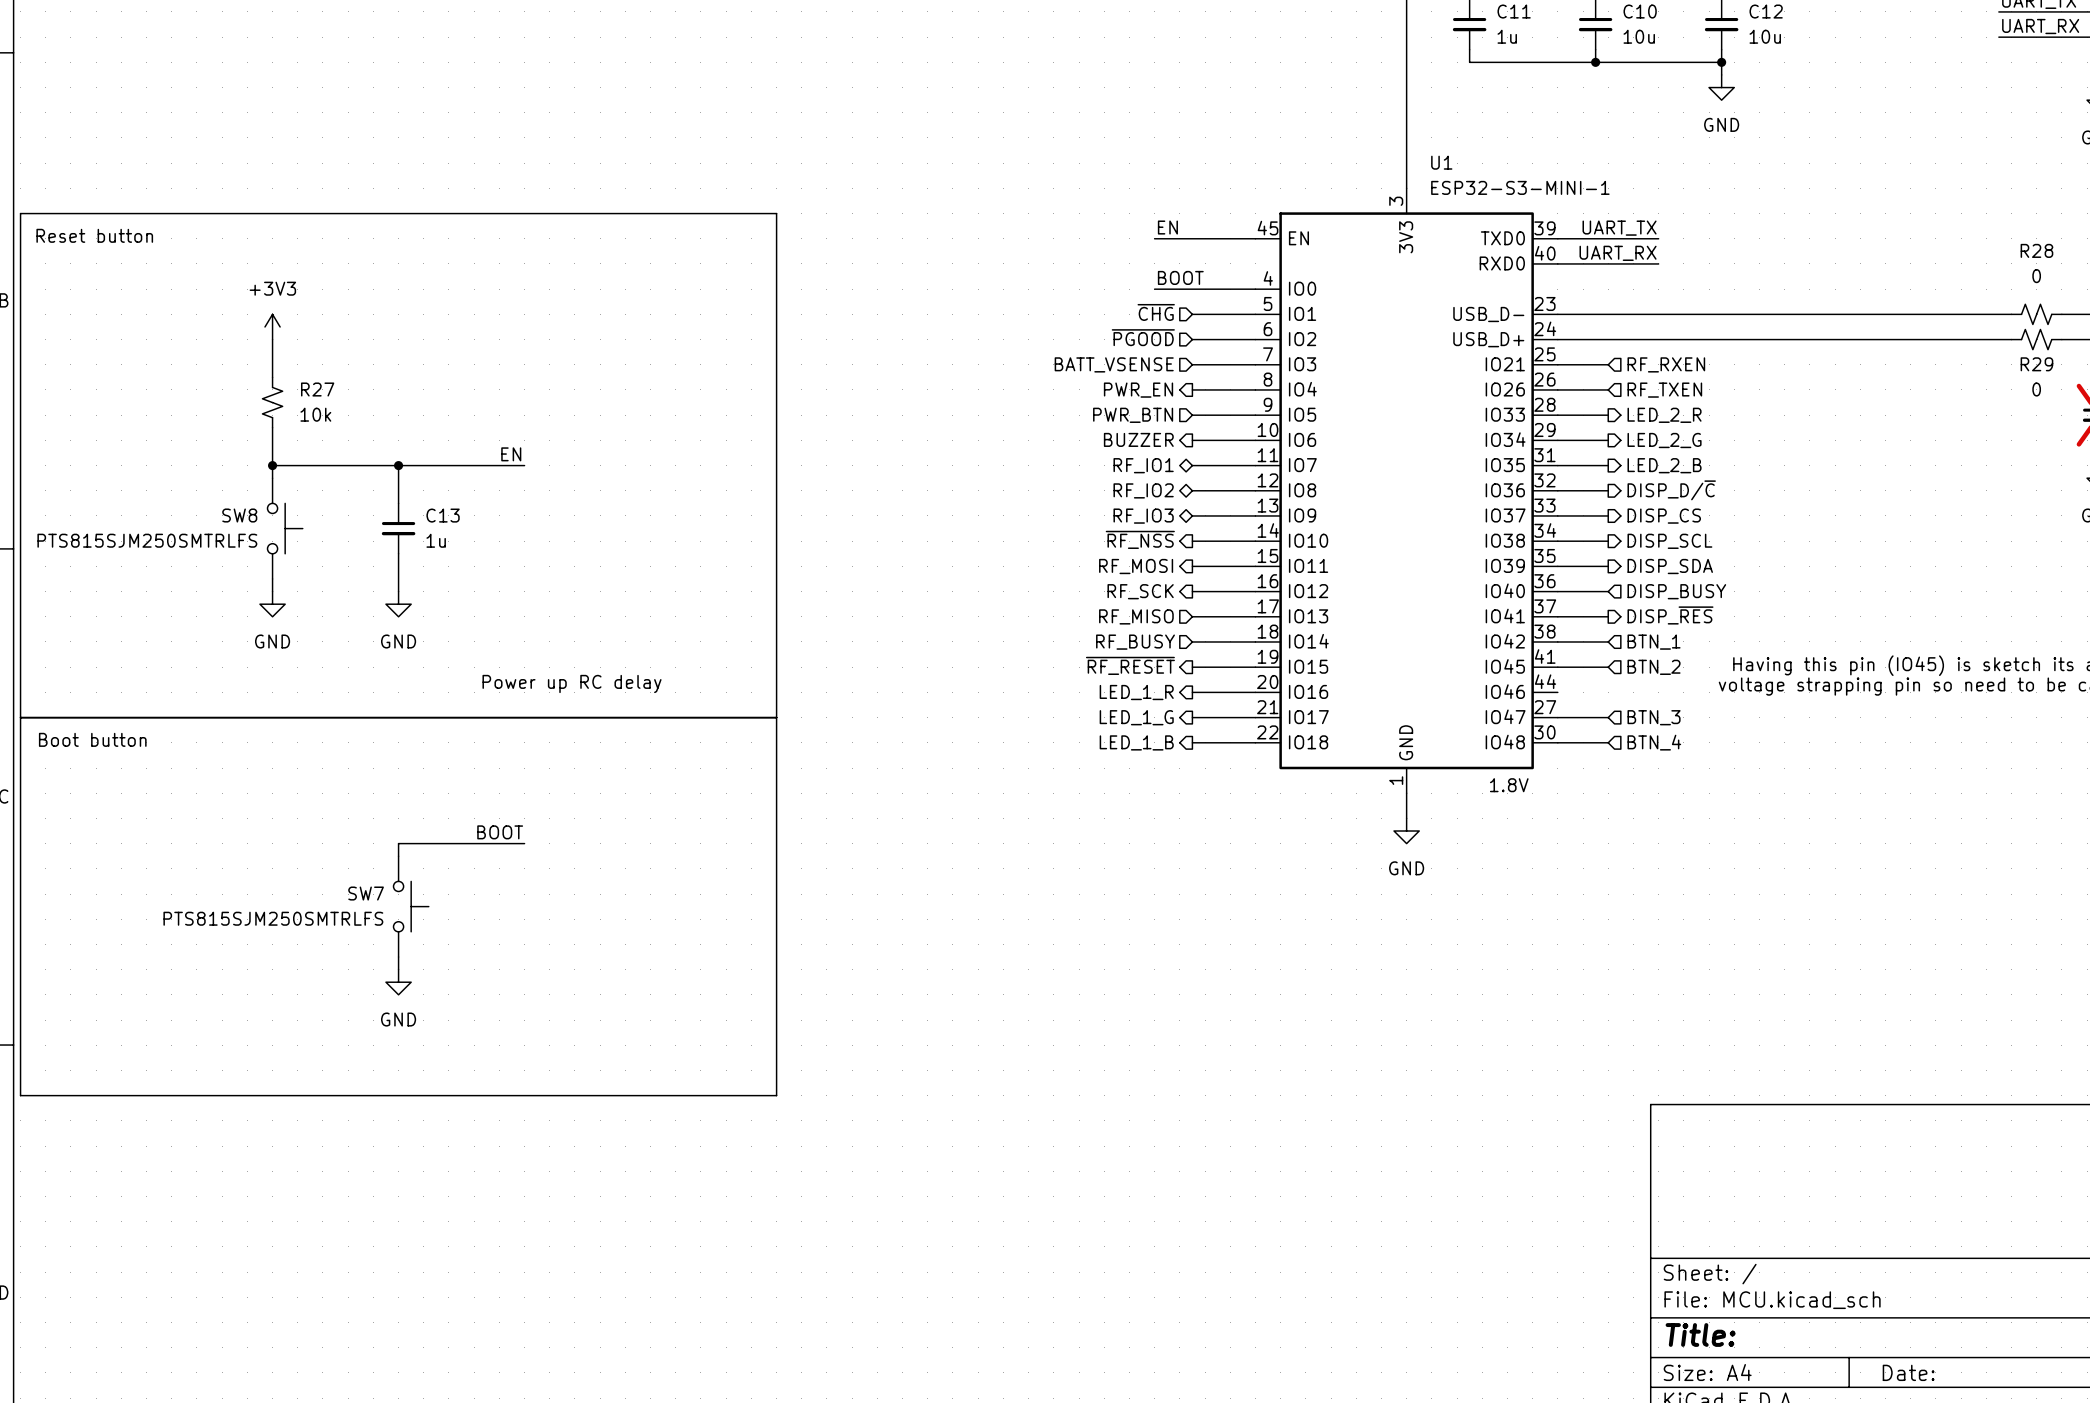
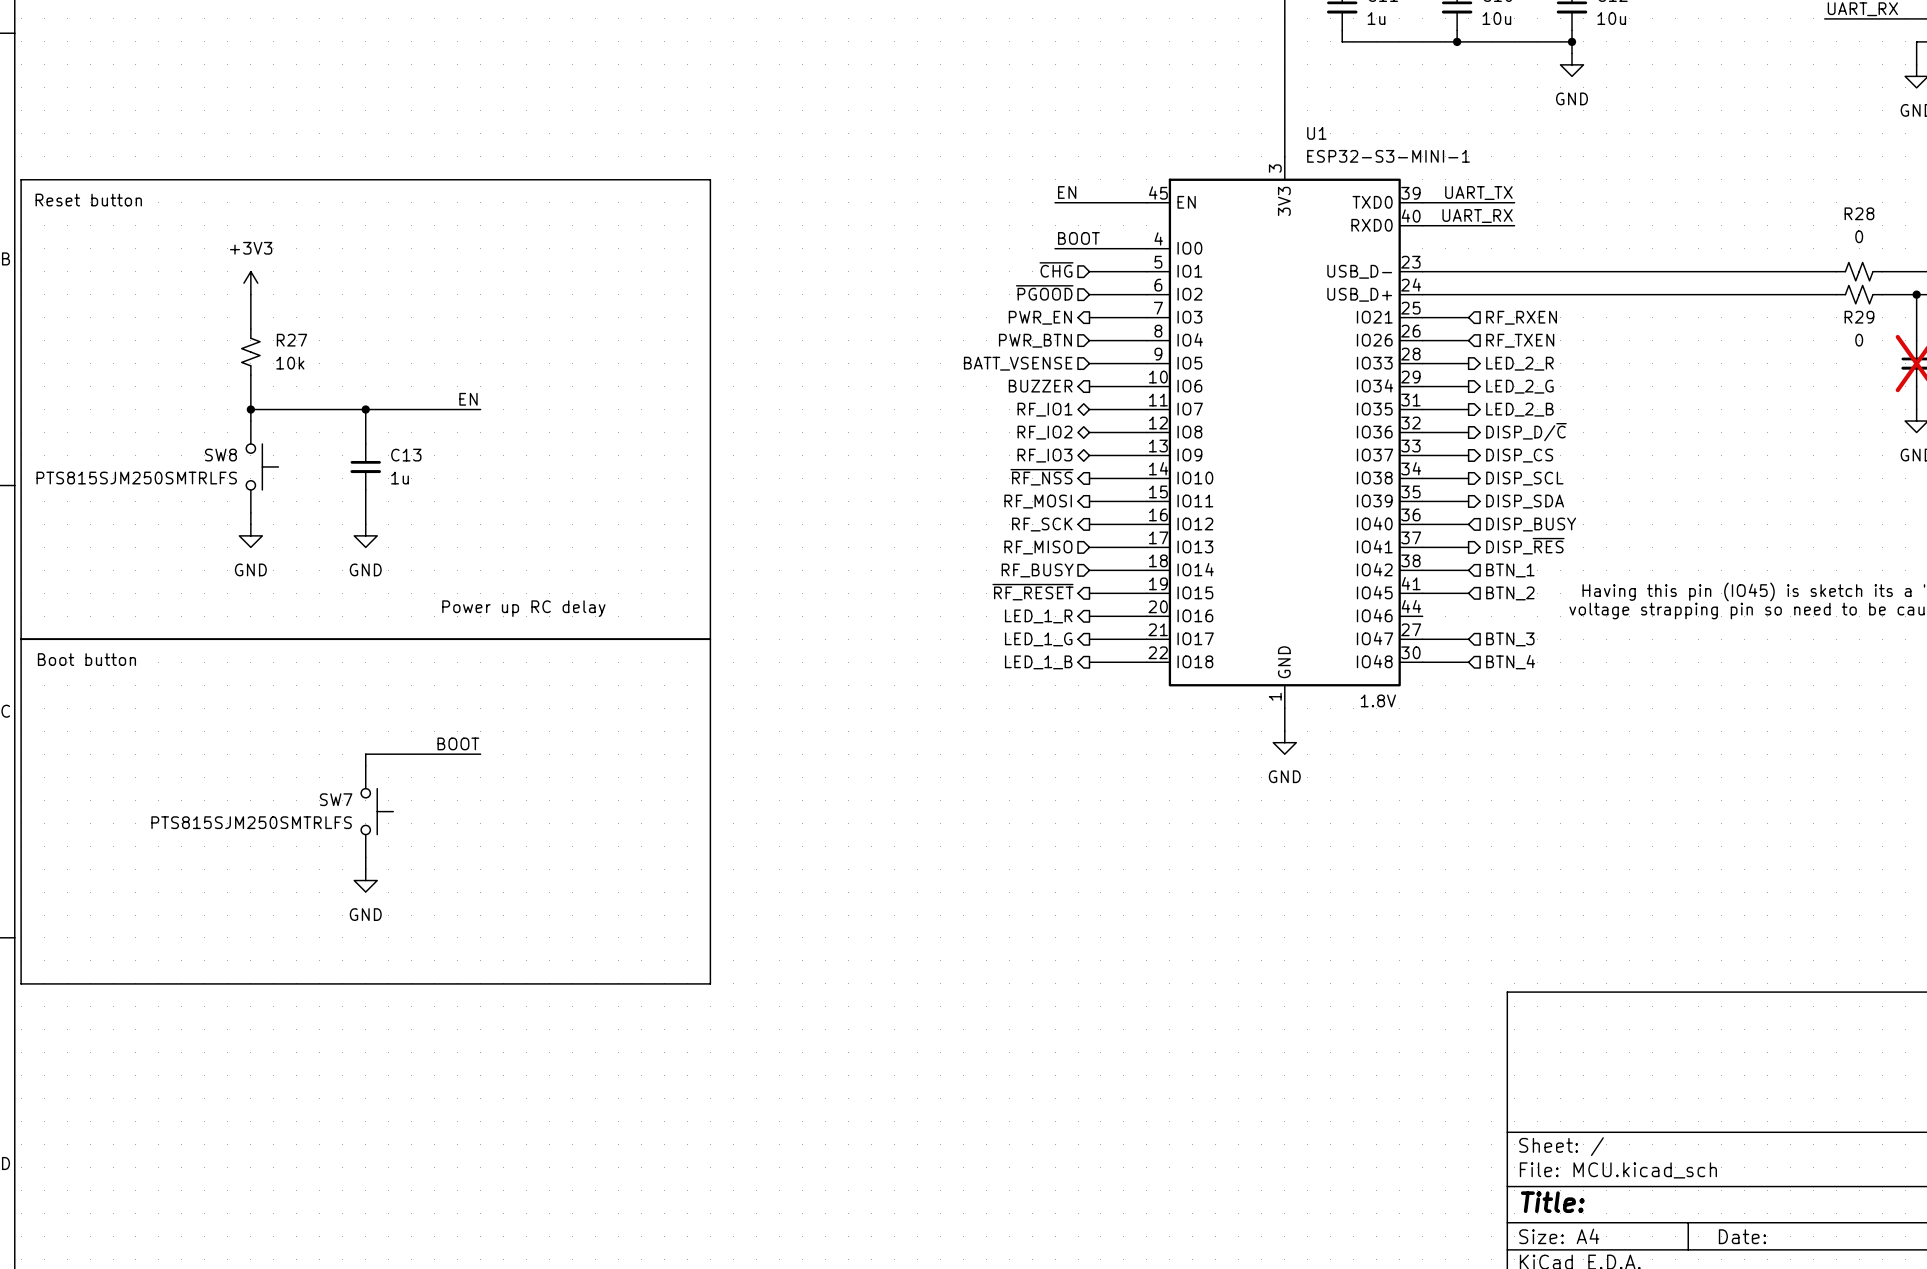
hierarchical label shape: input (1114, 364) -> output (1040, 317)
hierarchical label: BATT_VSENSE (1114, 364) -> PWR_EN (1040, 317)
hierarchical label shape: output (1138, 390) -> input (1035, 340)
hierarchical label: PWR_EN (1138, 390) -> PWR_BTN (1035, 340)
hierarchical label: PWR_BTN (1133, 415) -> BATT_VSENSE (1018, 363)

